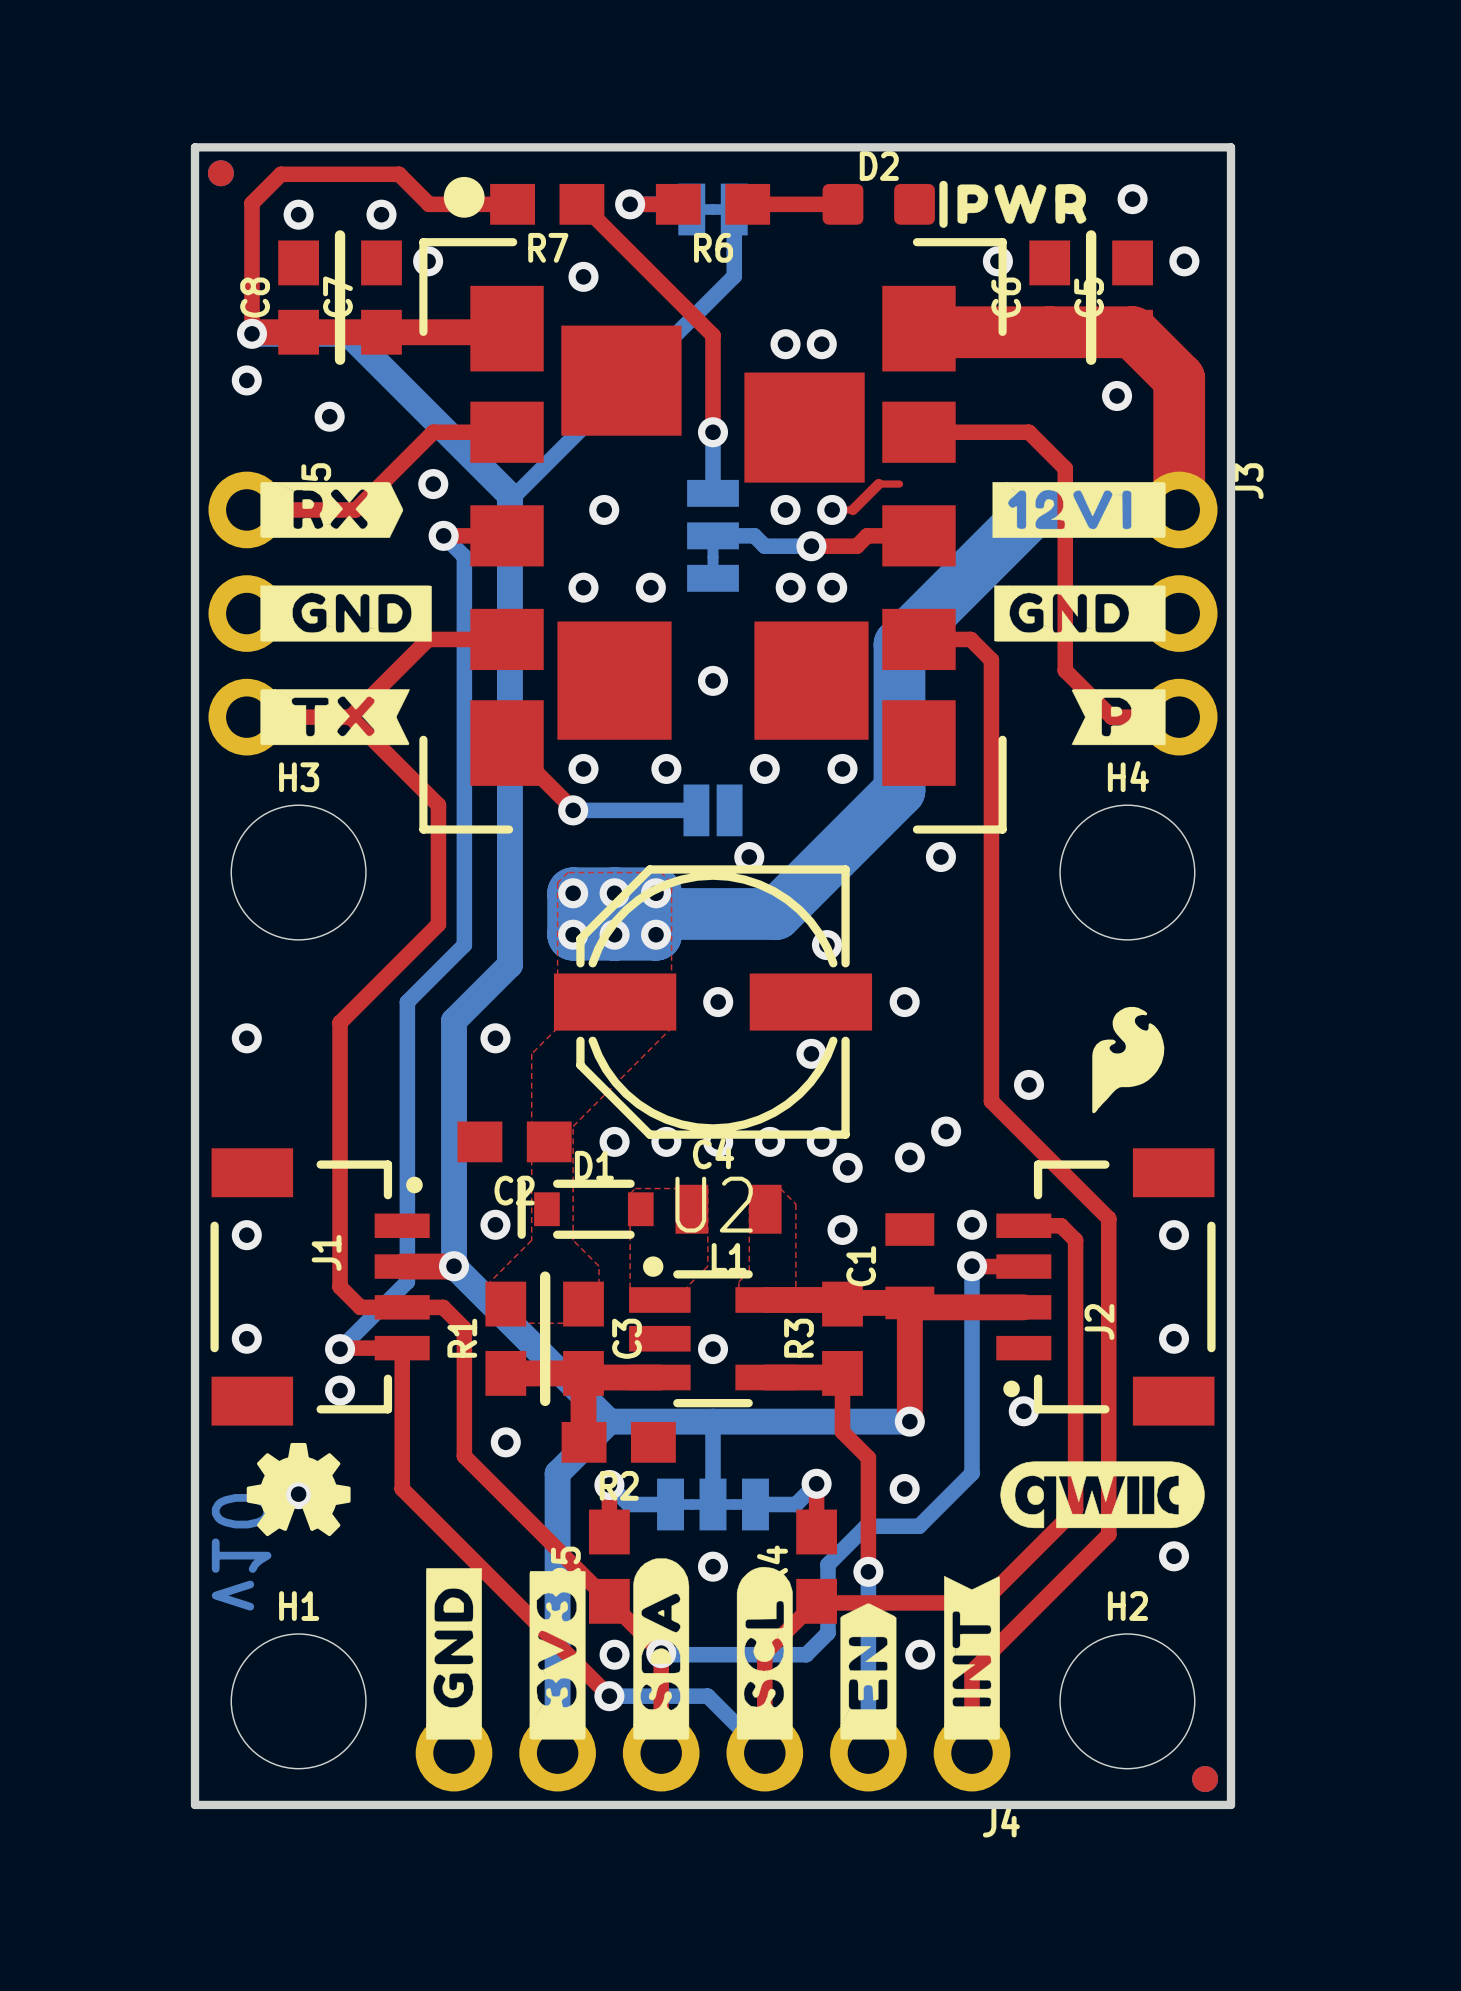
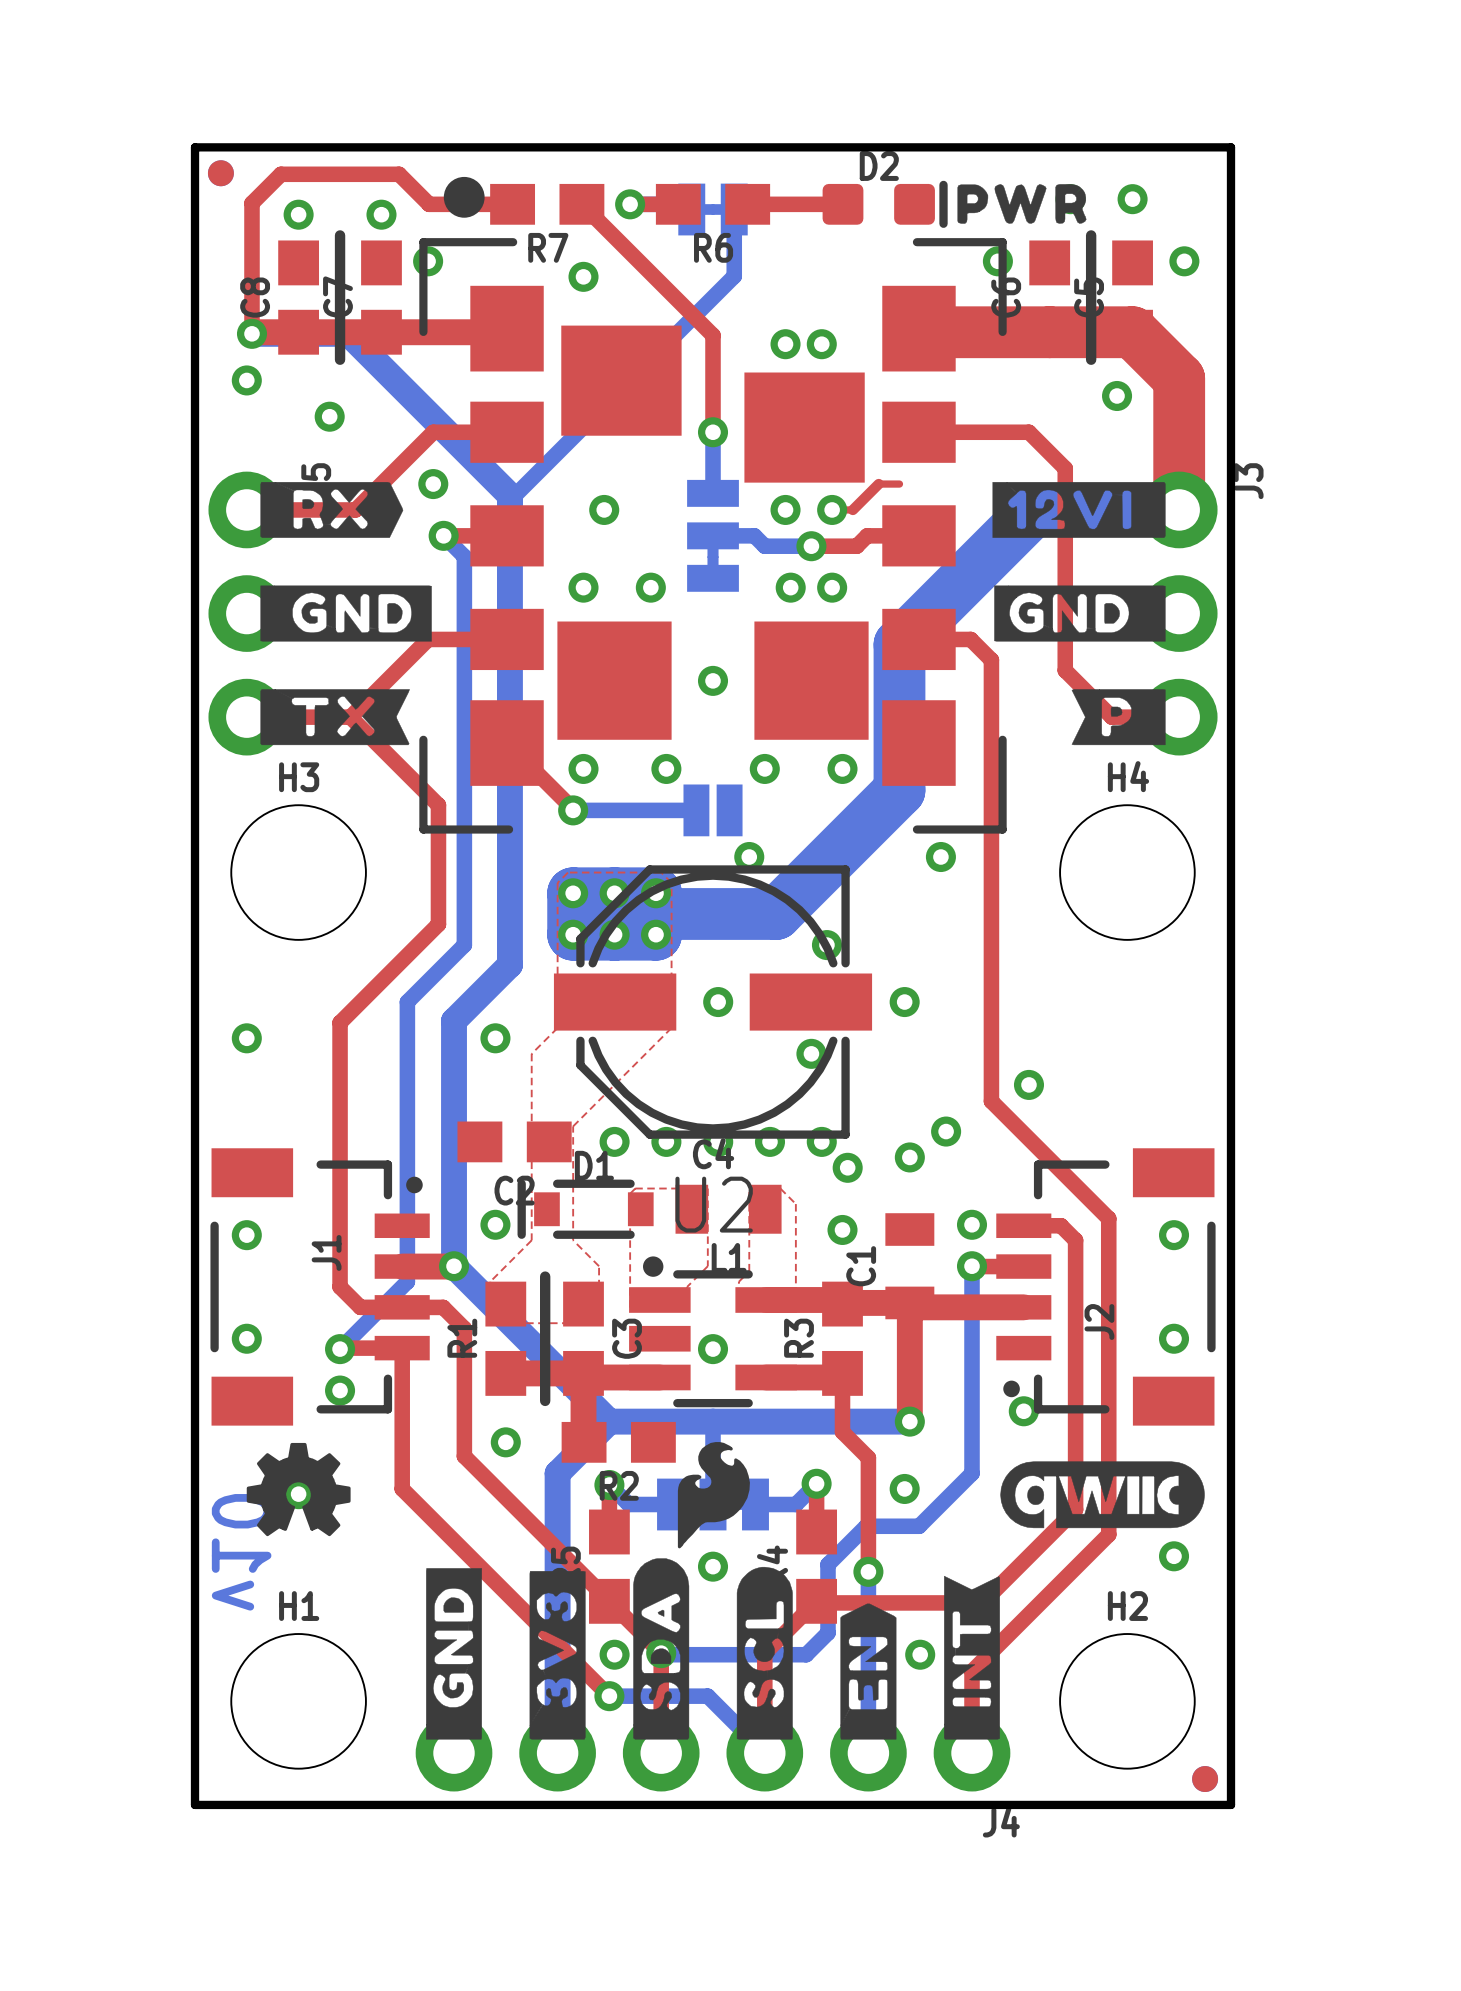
drawing position: (1128, 1060) -> (713, 1495)

